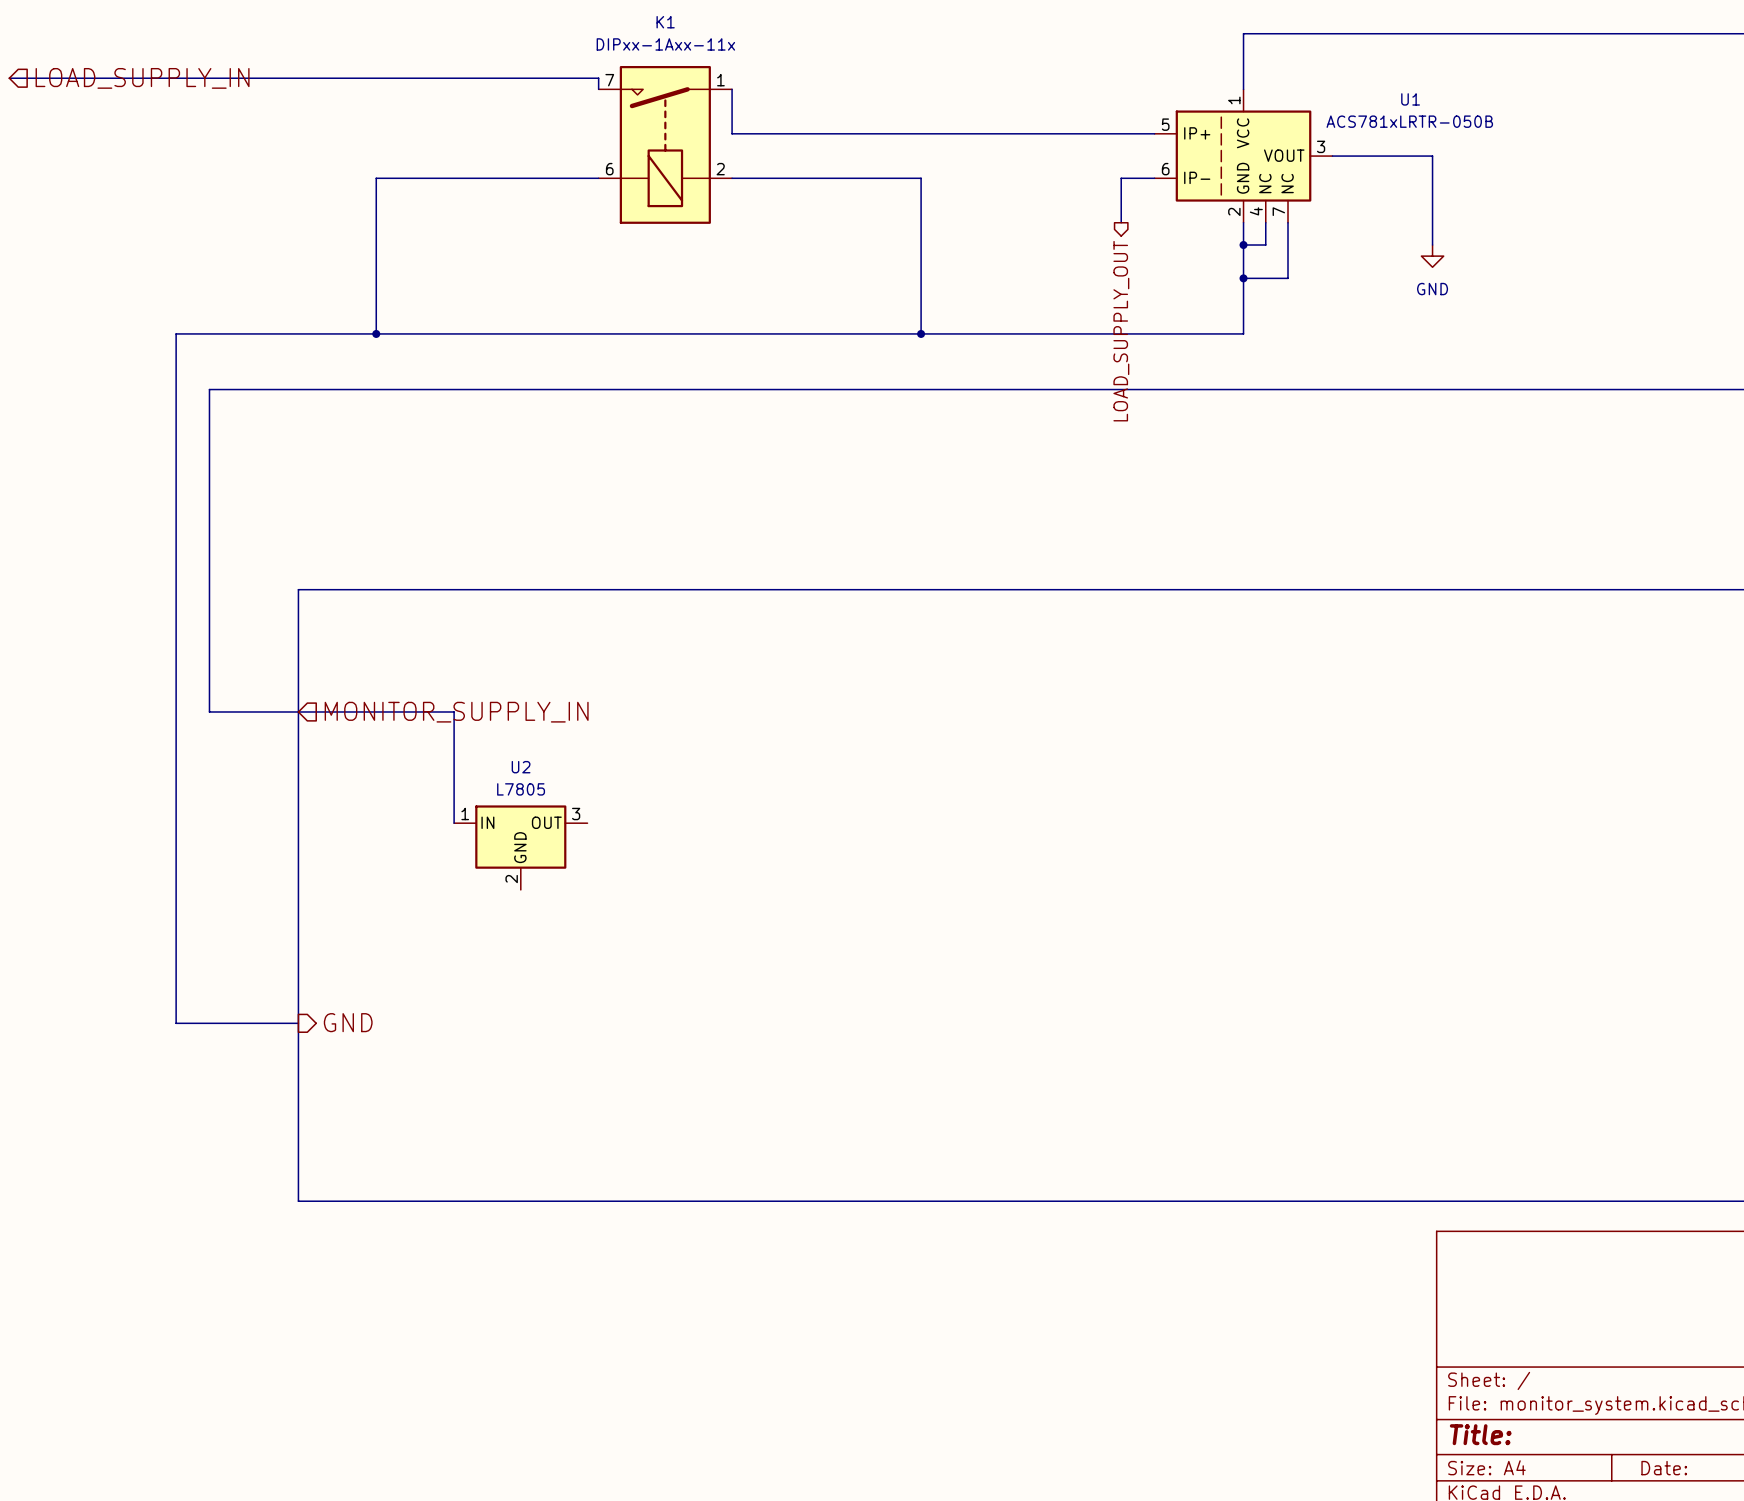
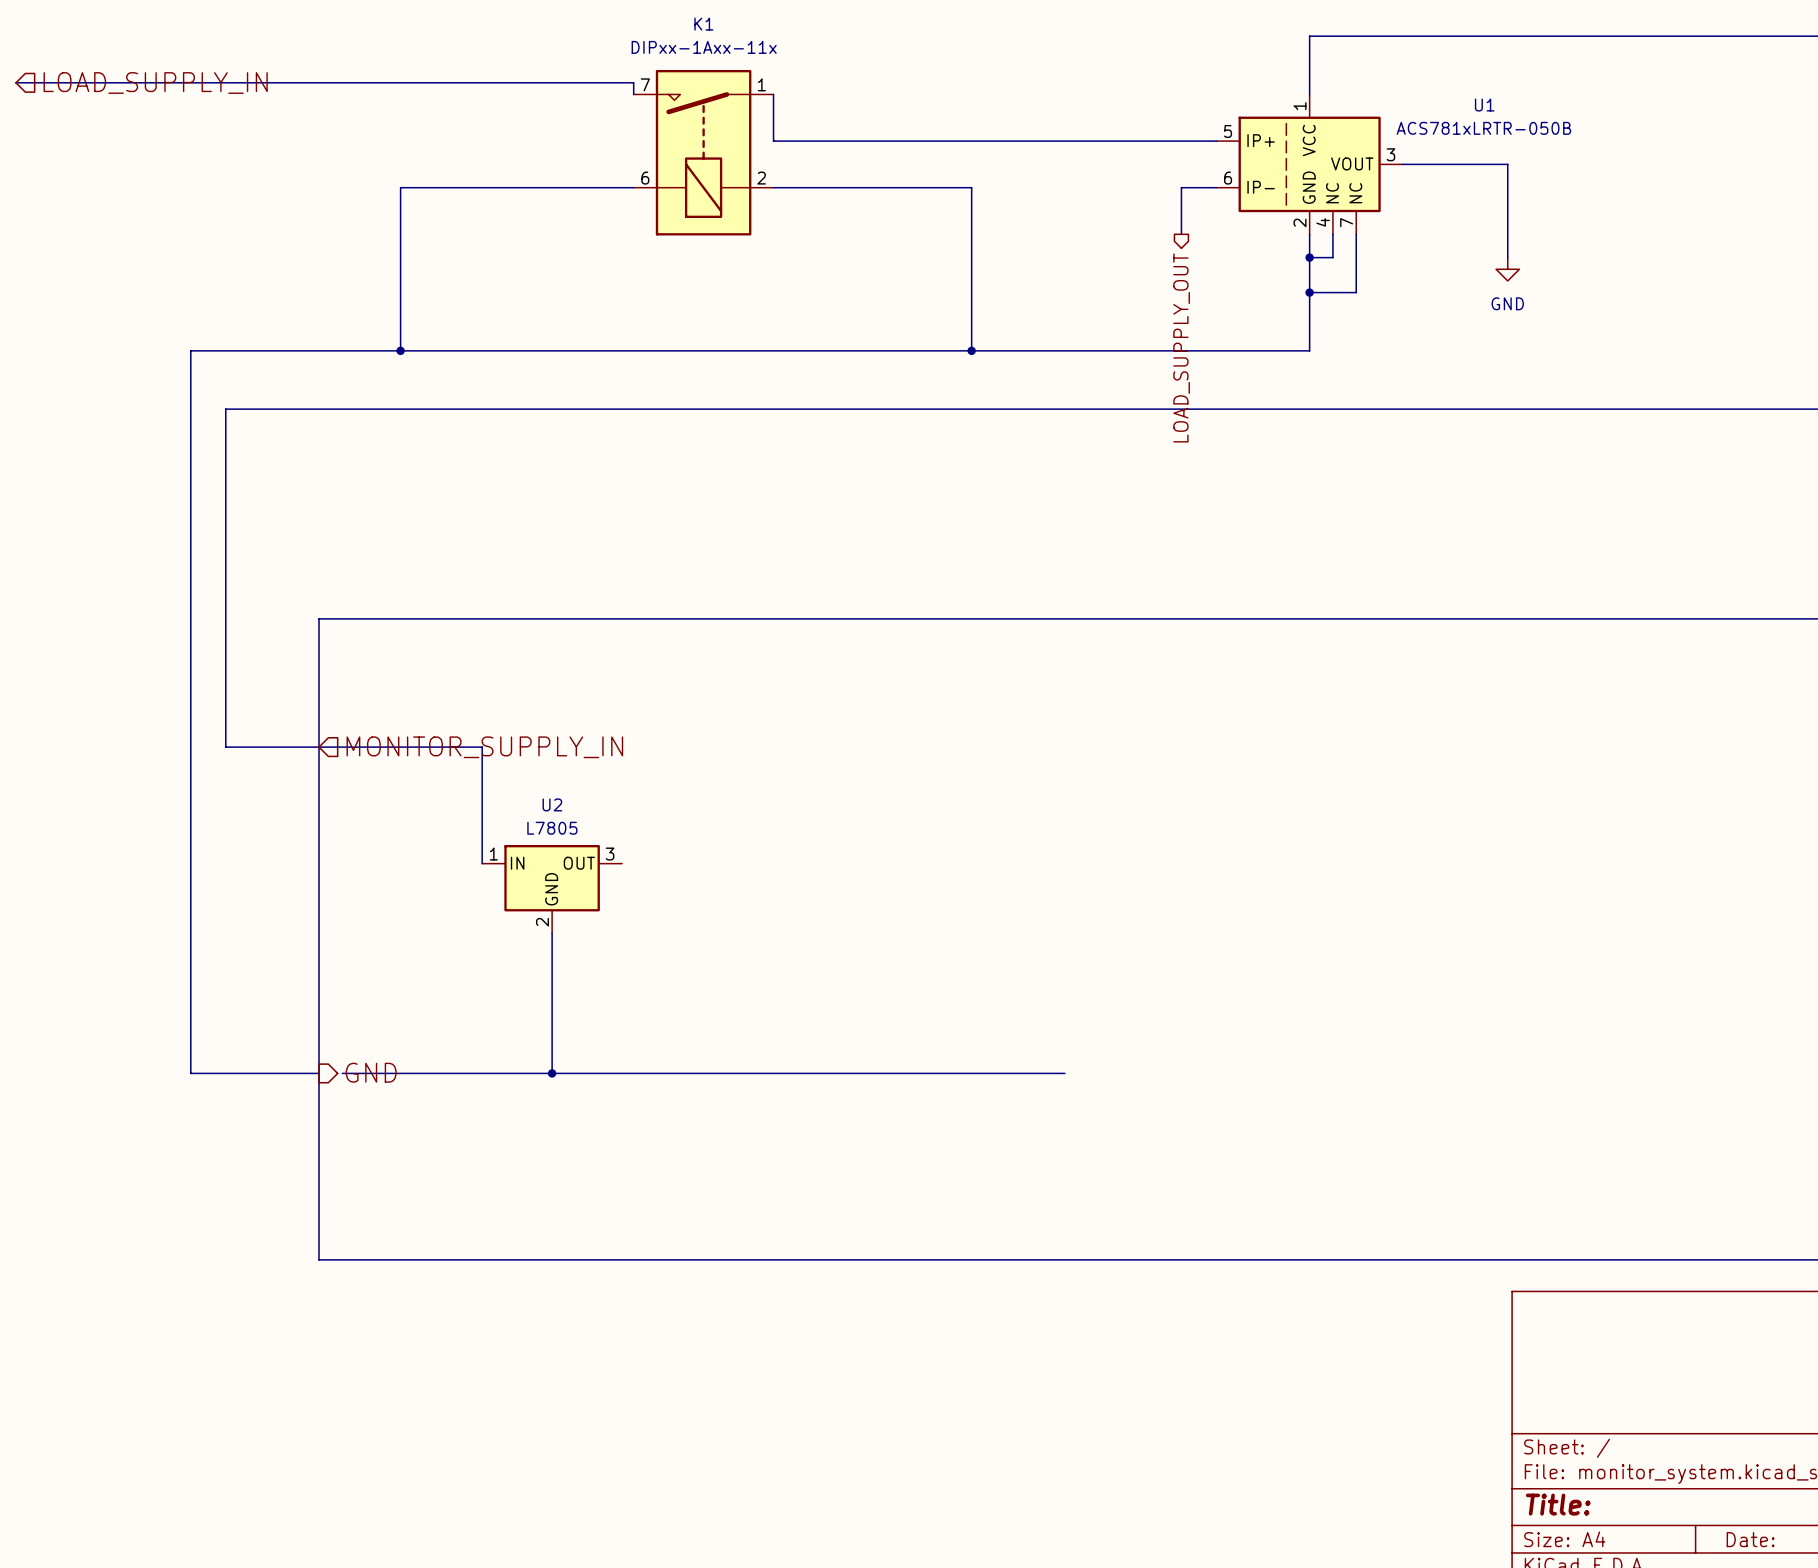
wire: none -> (552, 933) (552, 1073)
wire: none -> (342, 1073) (1064, 1073)
junction: none -> (552, 1073)

